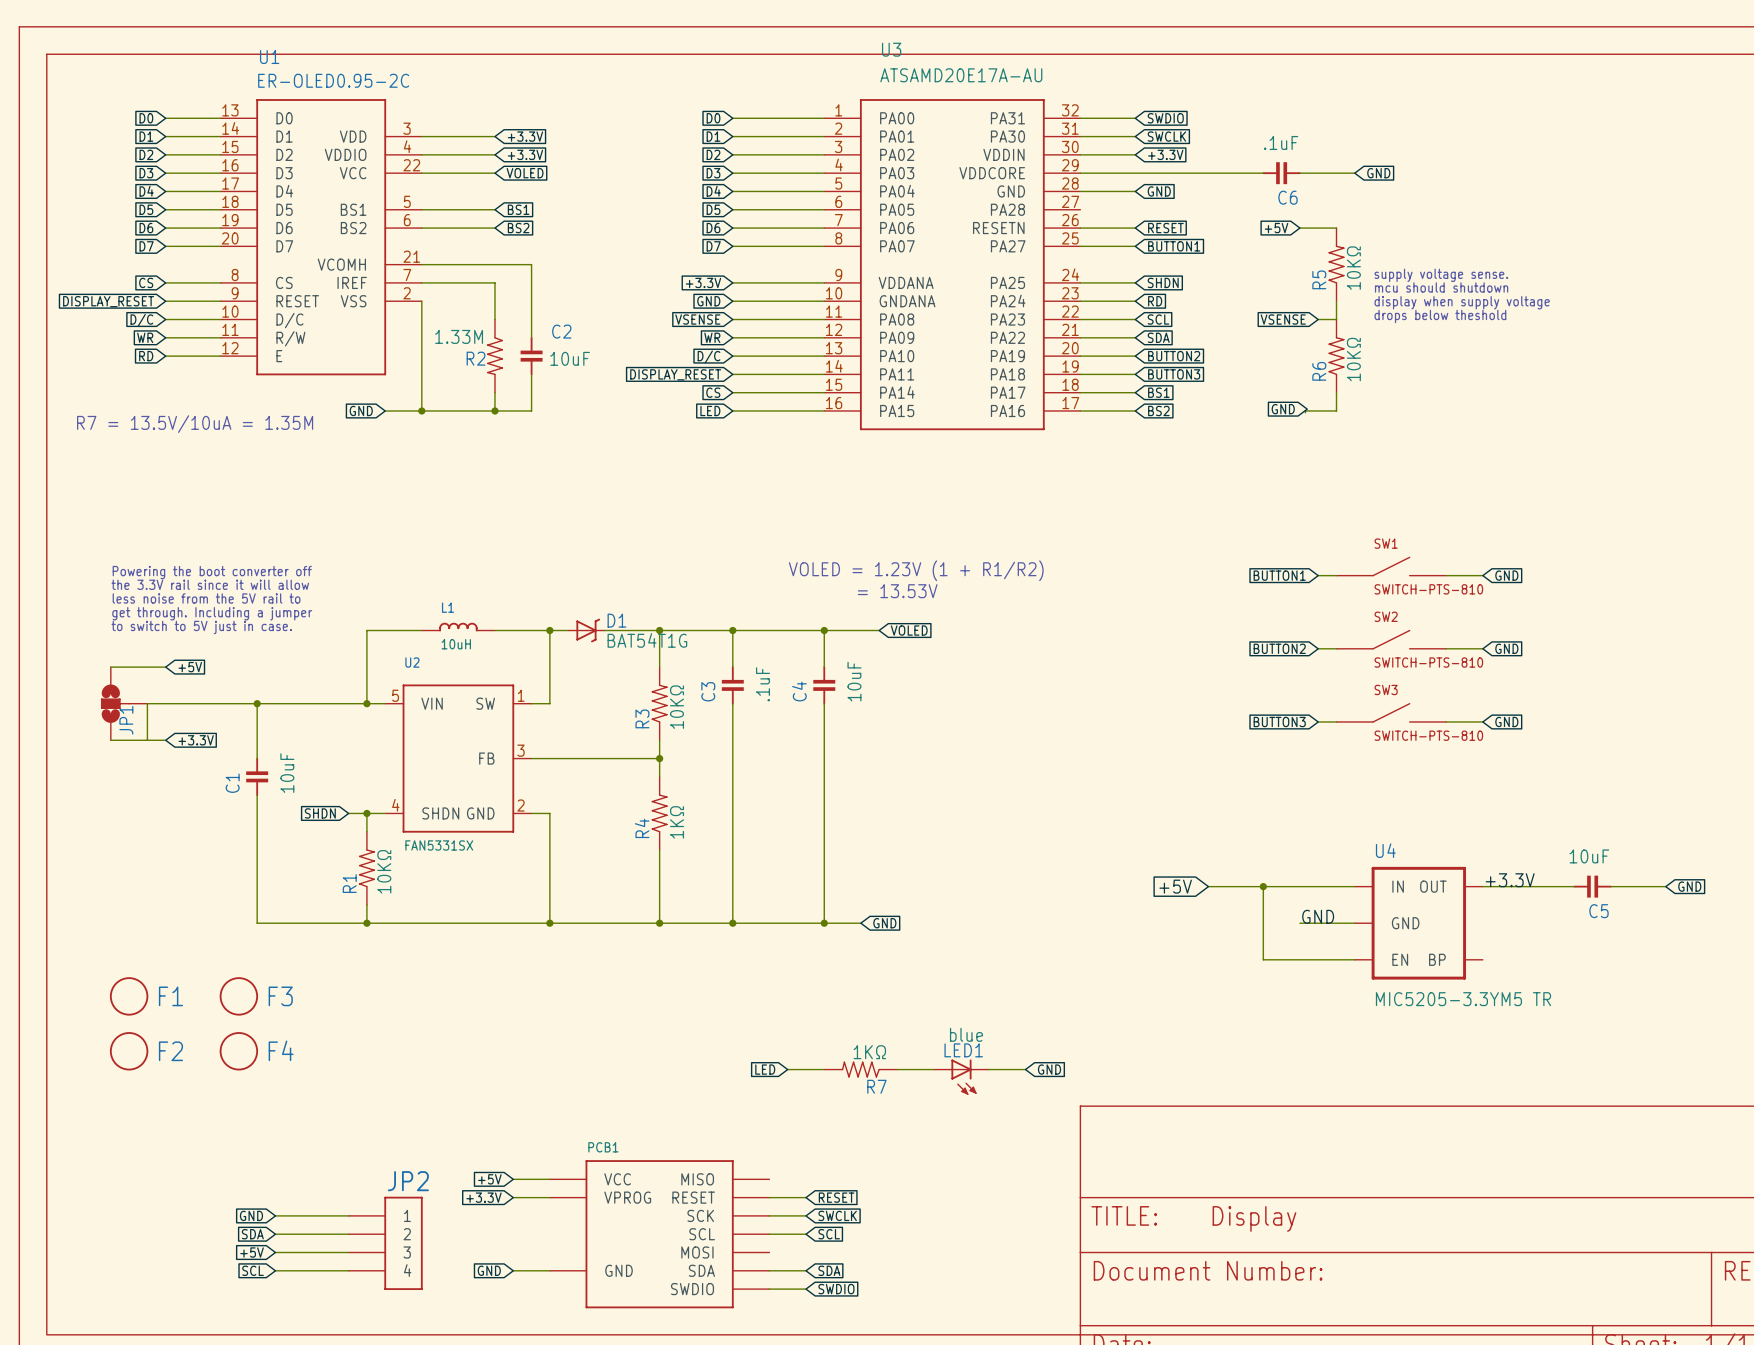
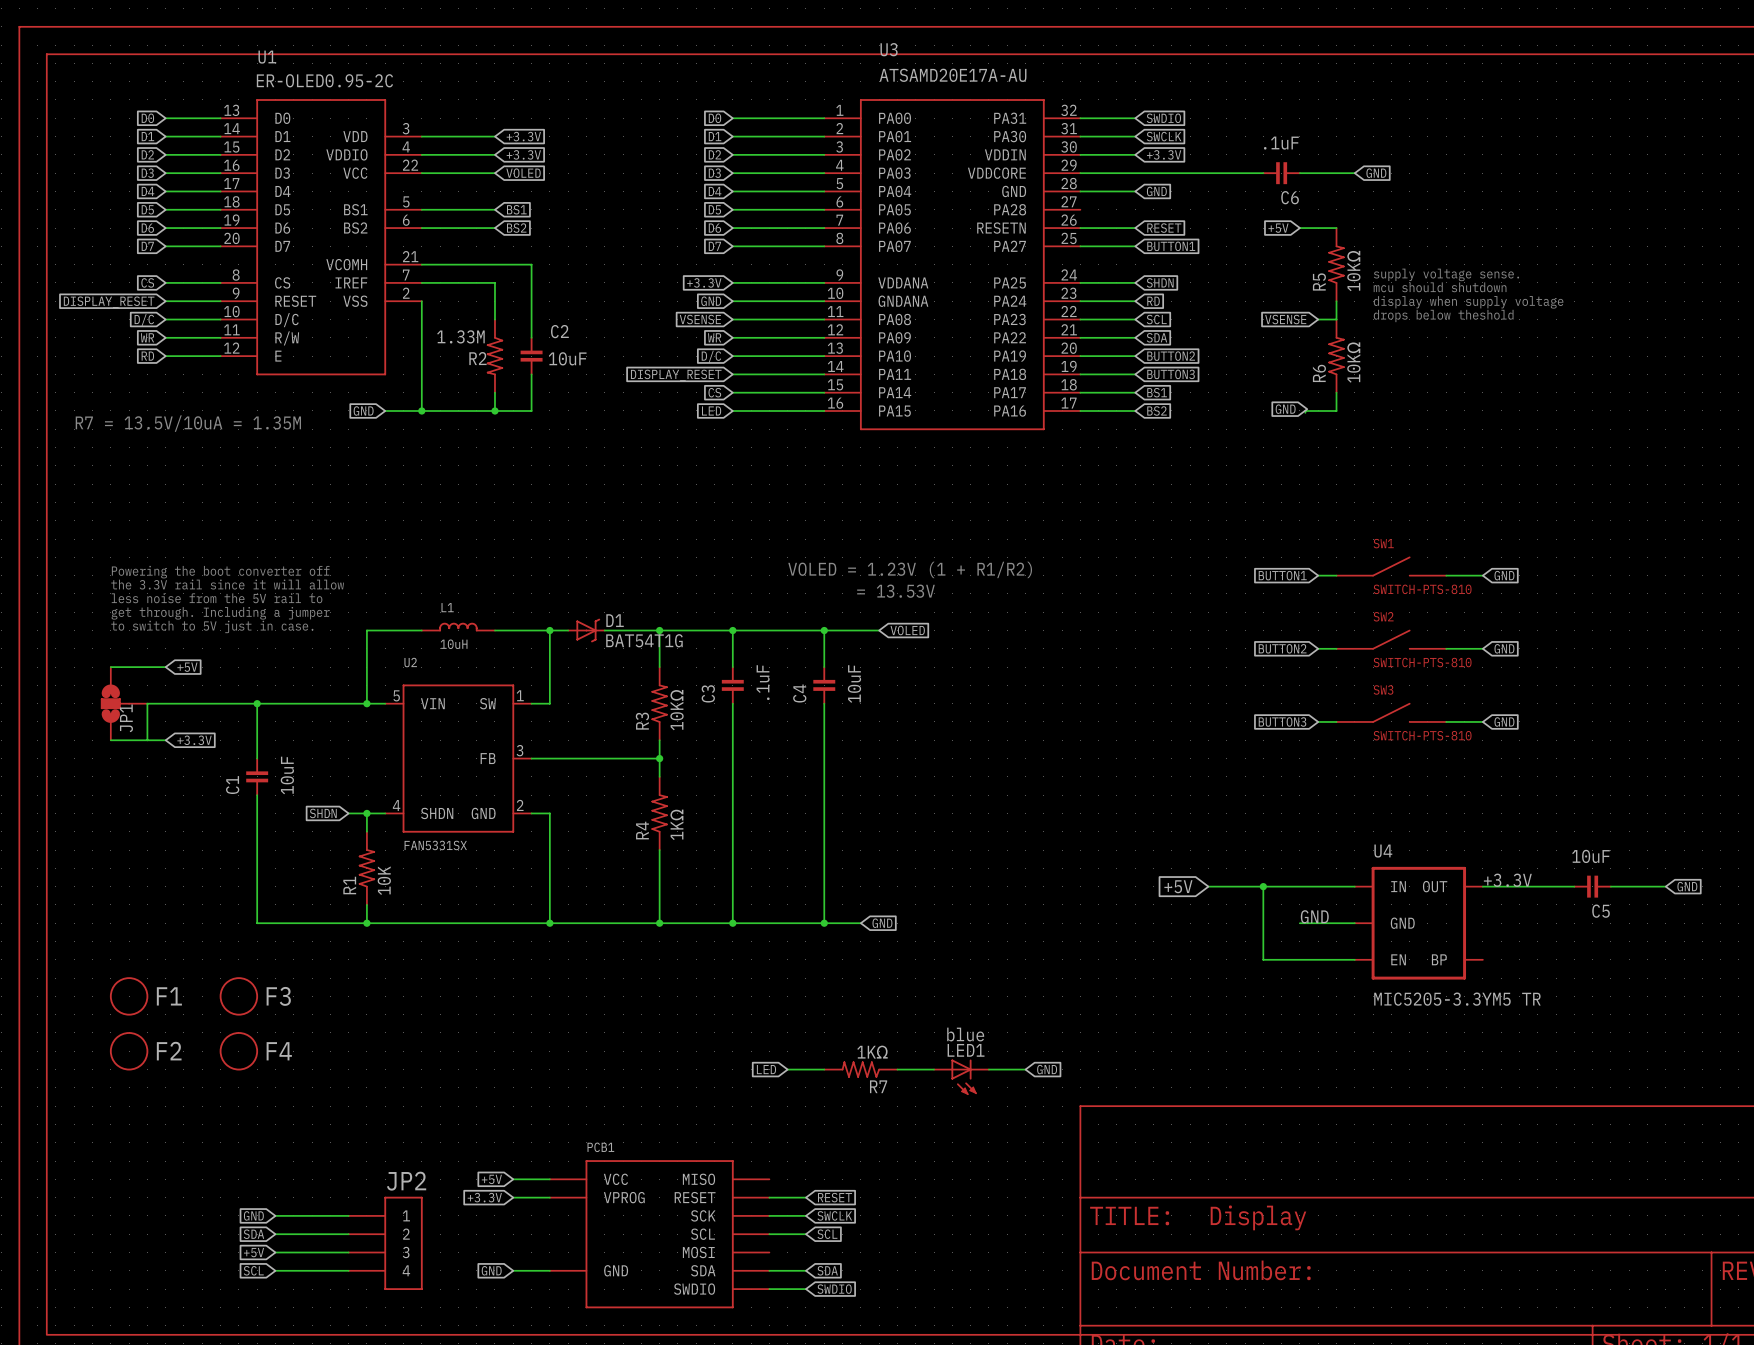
R1 value: 10KΩ (384, 871) -> 10K (384, 880)

